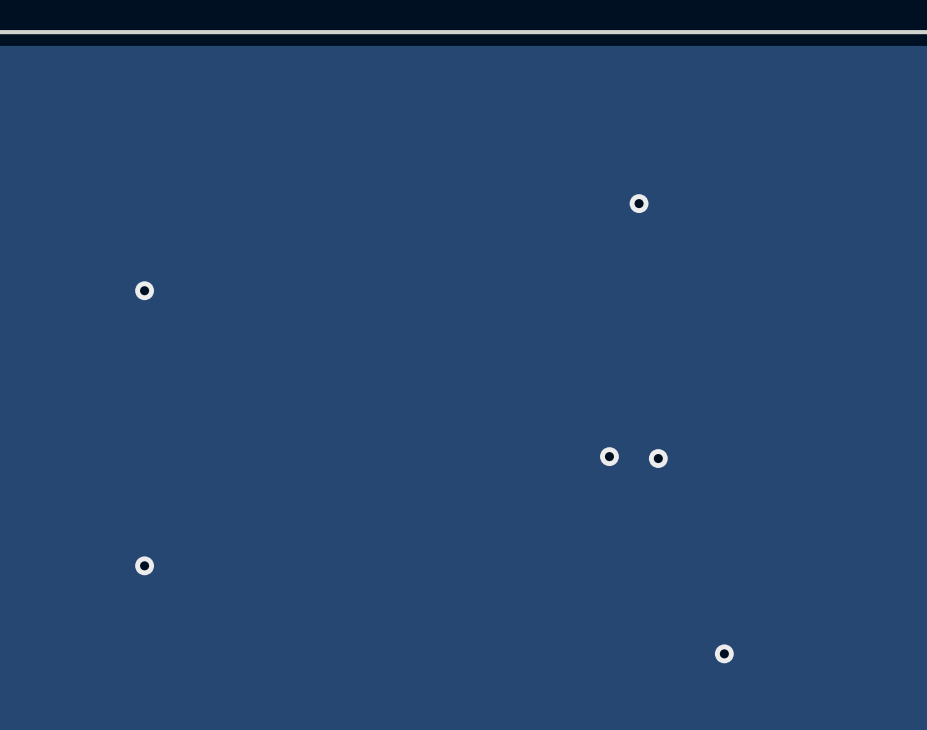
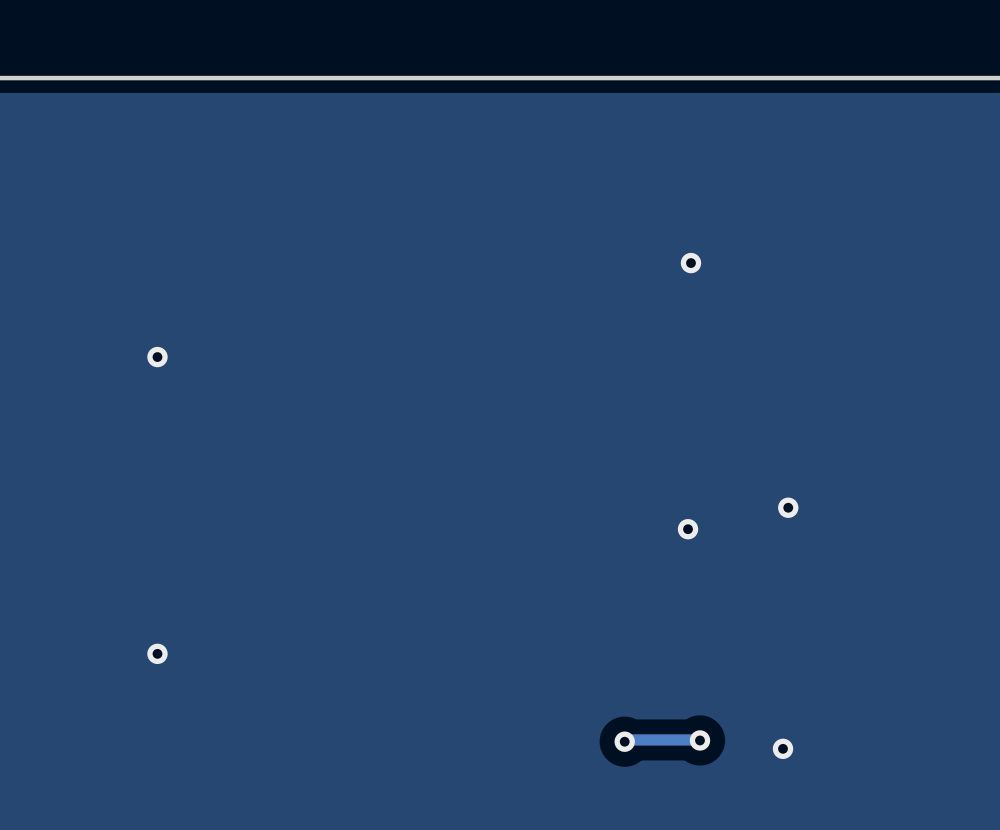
via: none -> (788, 507)
via: none -> (688, 529)
via: (609, 456) -> none
via: (658, 458) -> none
track: none -> (700, 740) (626, 739) (624, 741)
via: none -> (700, 740)
via: none -> (624, 741)

